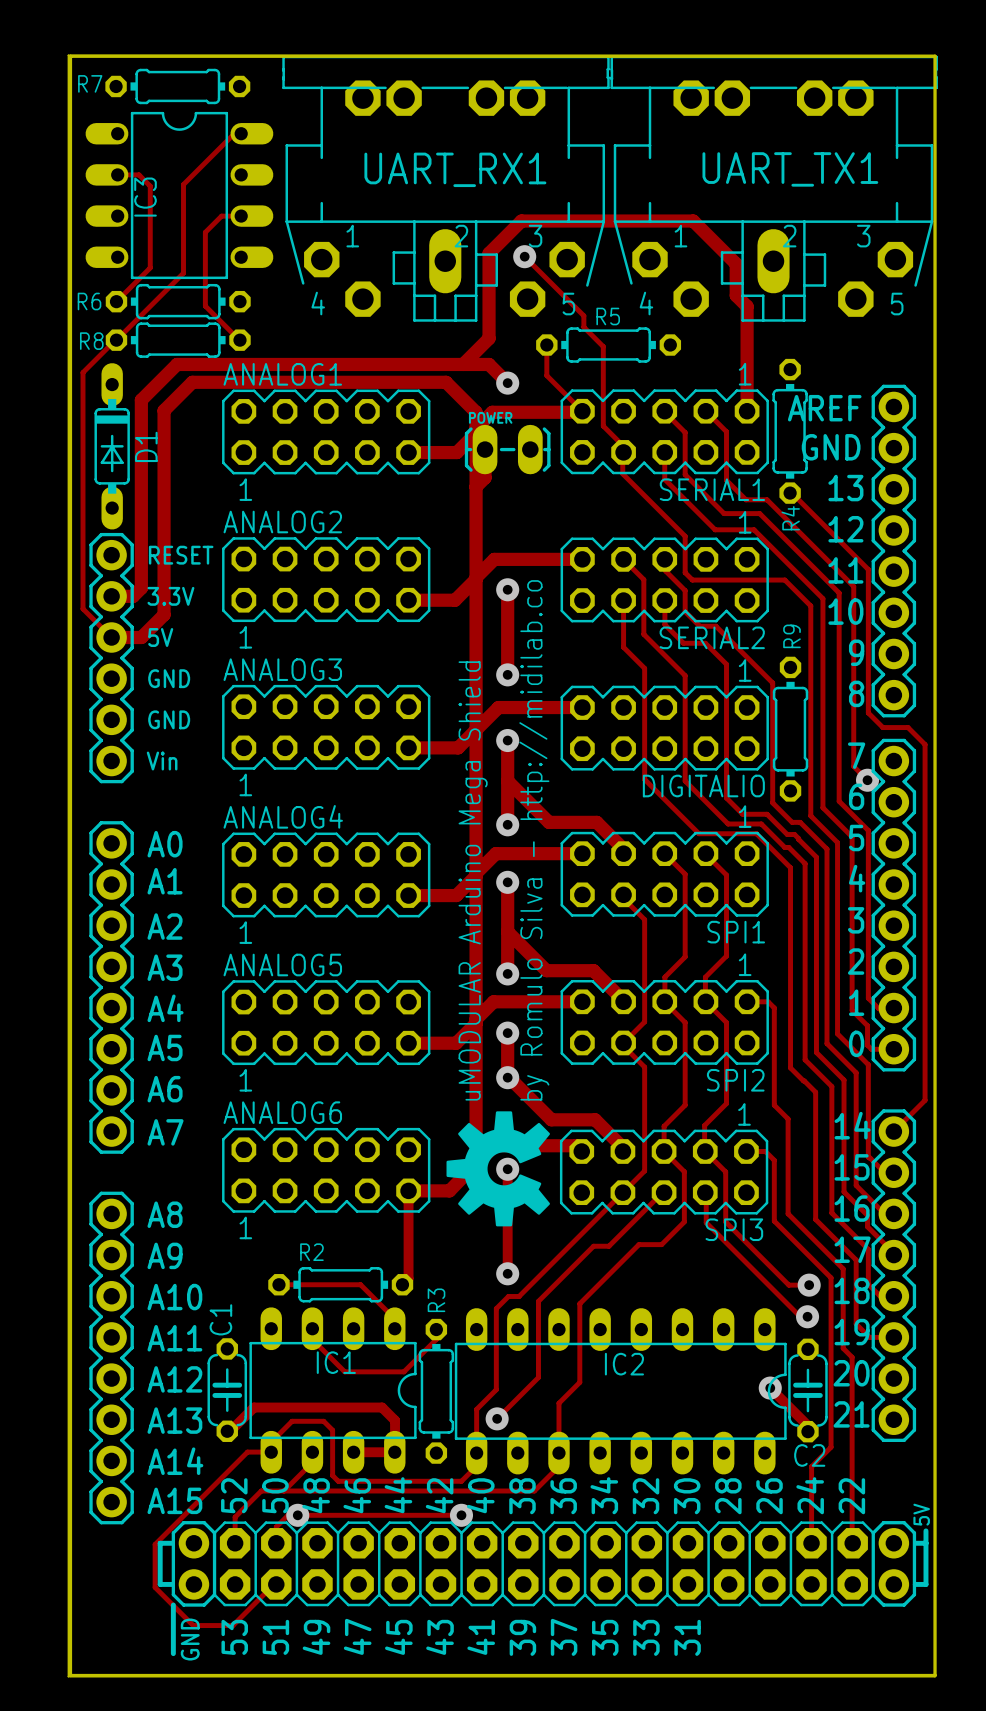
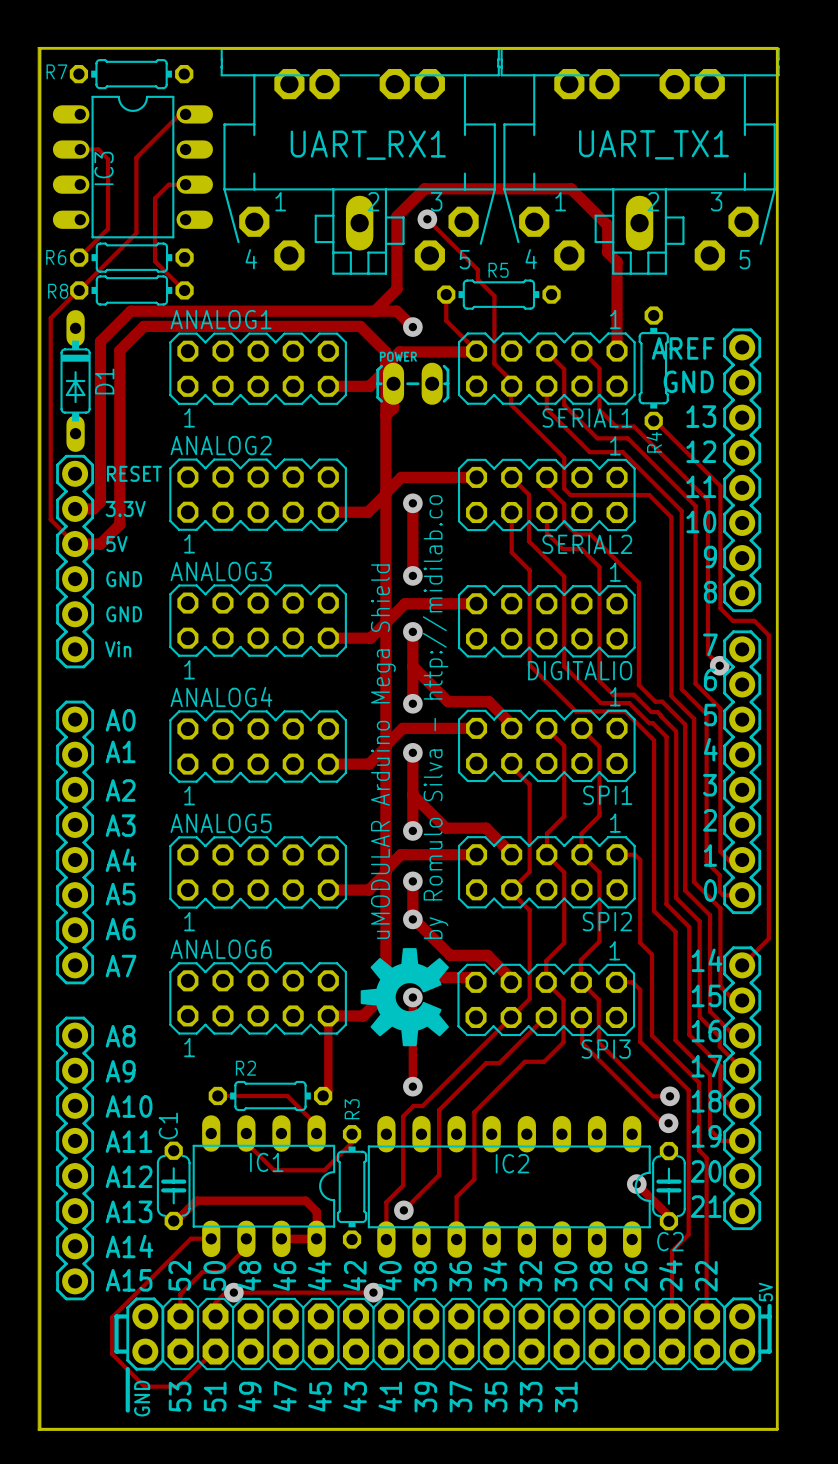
R9: (790, 729) -> none
track: (271, 1452) (271, 1442) (292, 1421) (323, 1421) (332, 1430) (332, 1475) (338, 1481) (461, 1481) (476, 1465) -> none
track: (558, 1466) (534, 1491) (284, 1491) -> none

